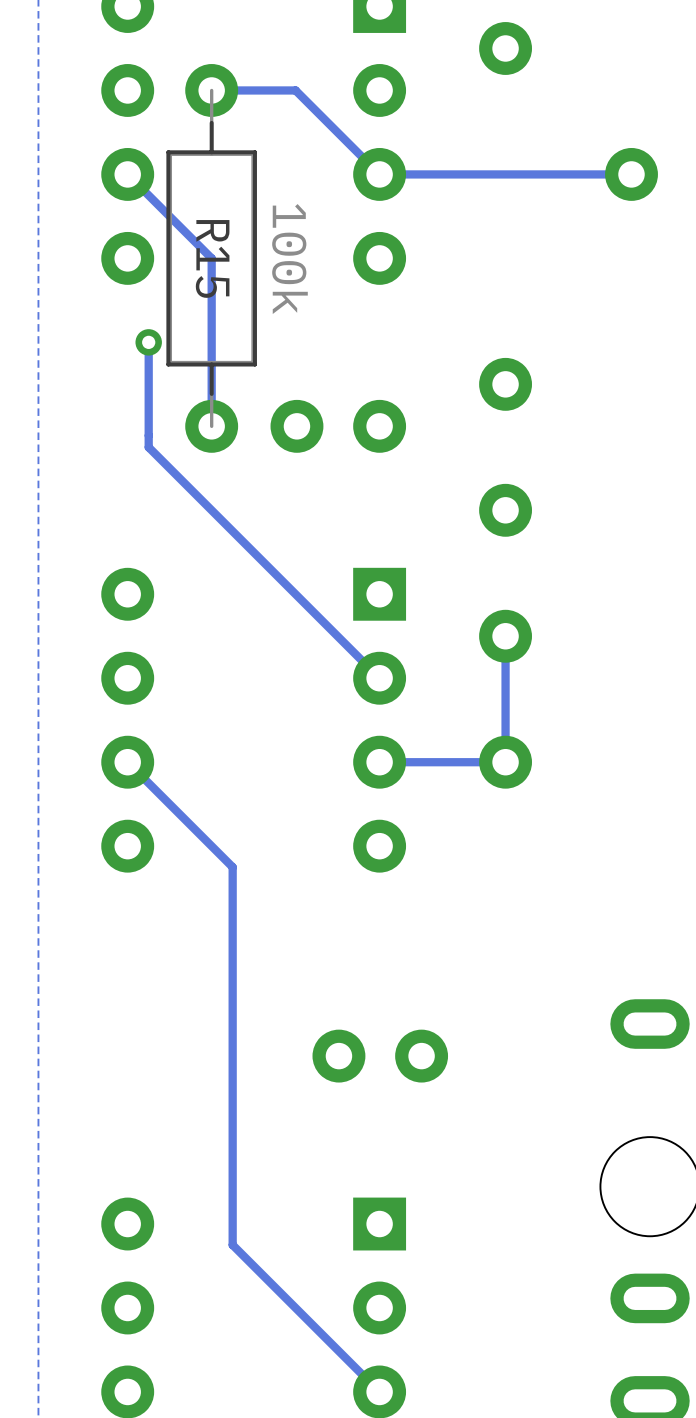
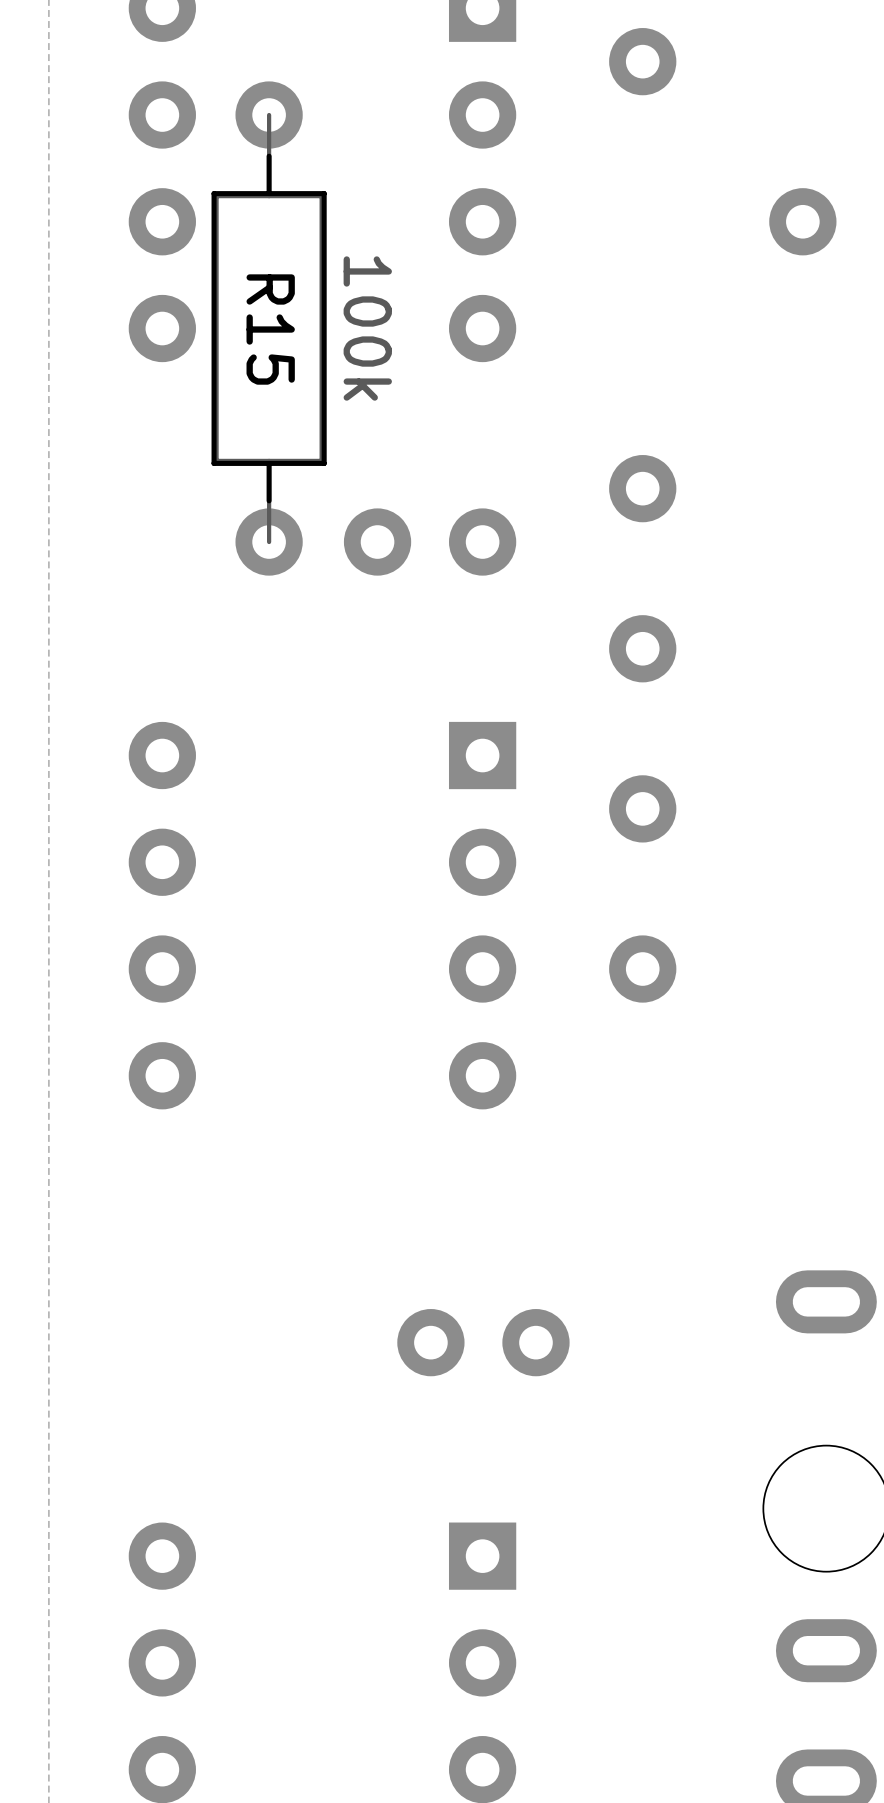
track: (211, 90) (295, 90) (379, 174) (631, 174) -> none
track: (127, 174) (211, 258) (211, 426) -> none
track: (148, 342) (148, 447) (379, 678) -> none
via: (148, 342) -> none
track: (505, 636) (505, 762) (379, 762) -> none
track: (127, 762) (232, 867) (232, 1245) (379, 1391) -> none

